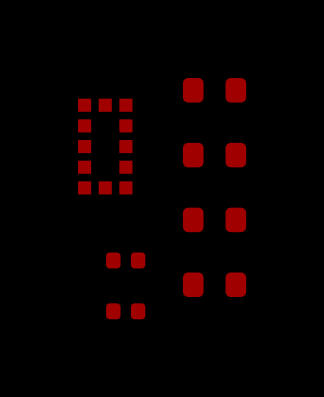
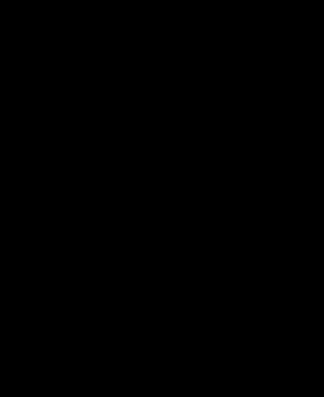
part: (214, 90) -> none
part: (105, 146) -> none
part: (214, 155) -> none
part: (214, 219) -> none
part: (125, 260) -> none
part: (214, 284) -> none
part: (125, 311) -> none

